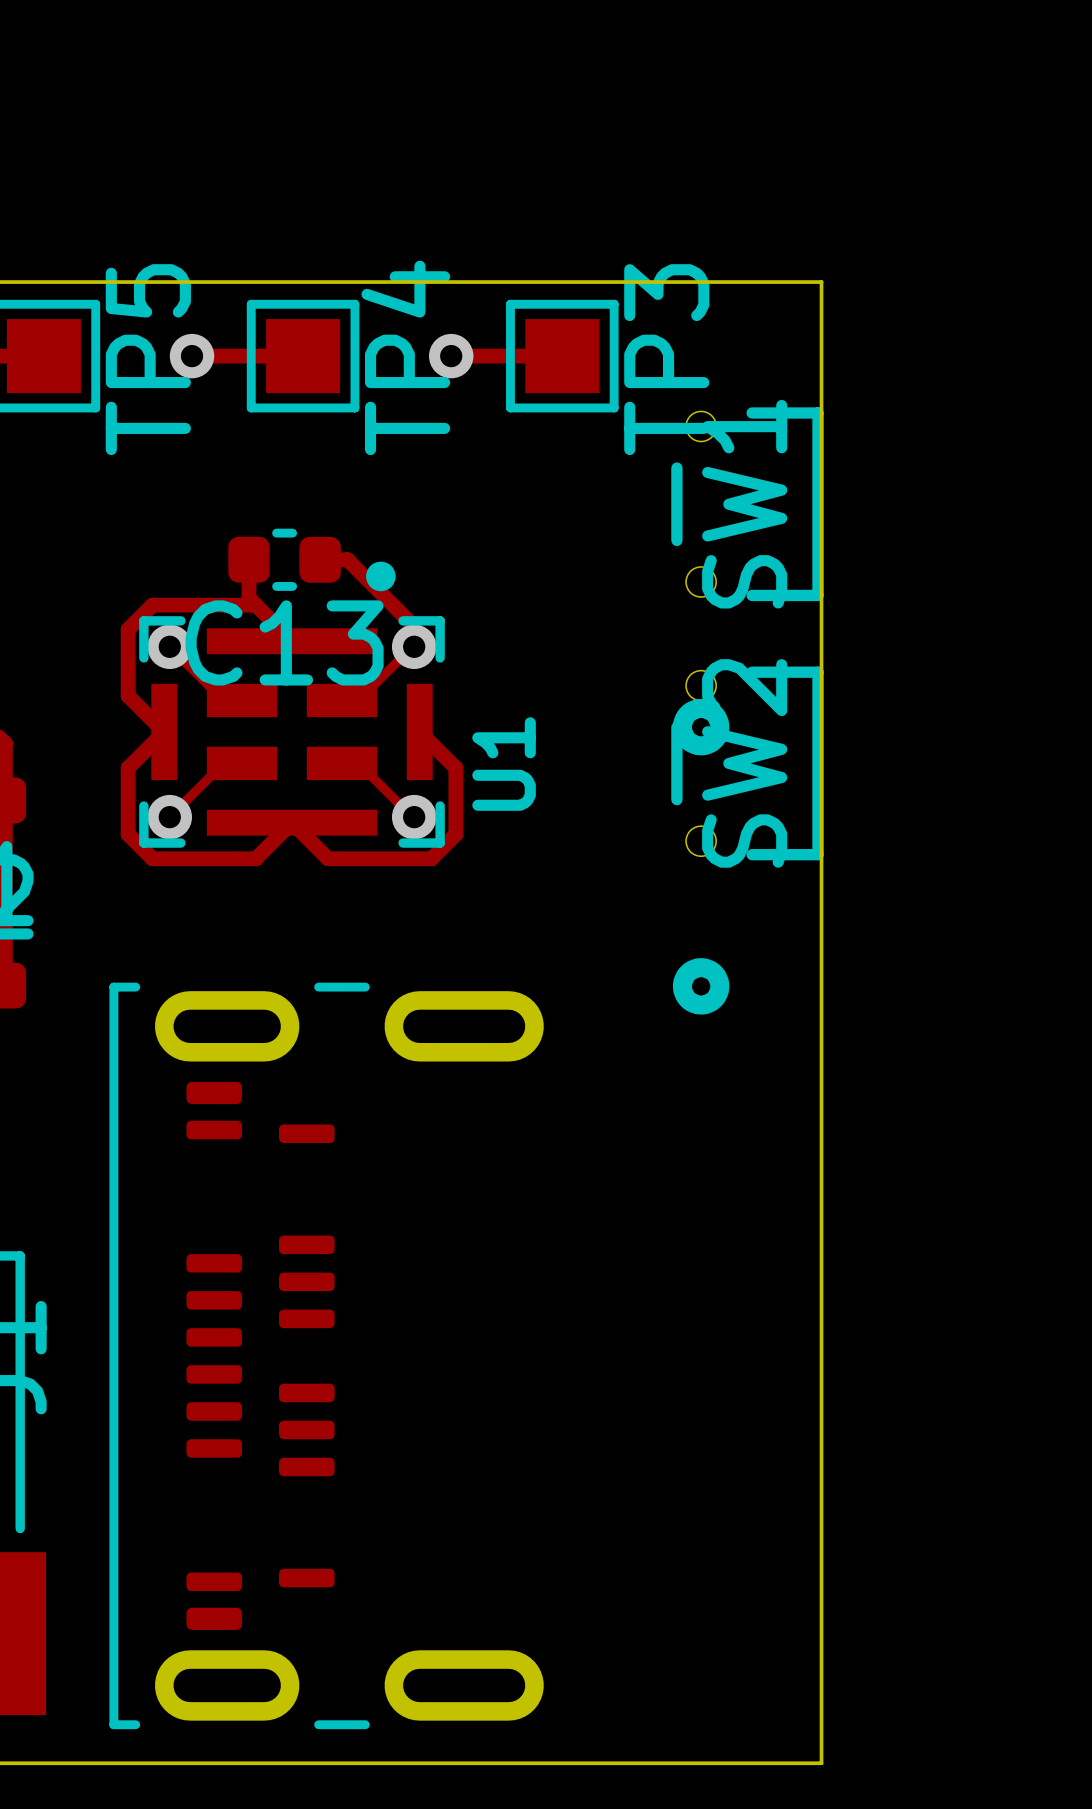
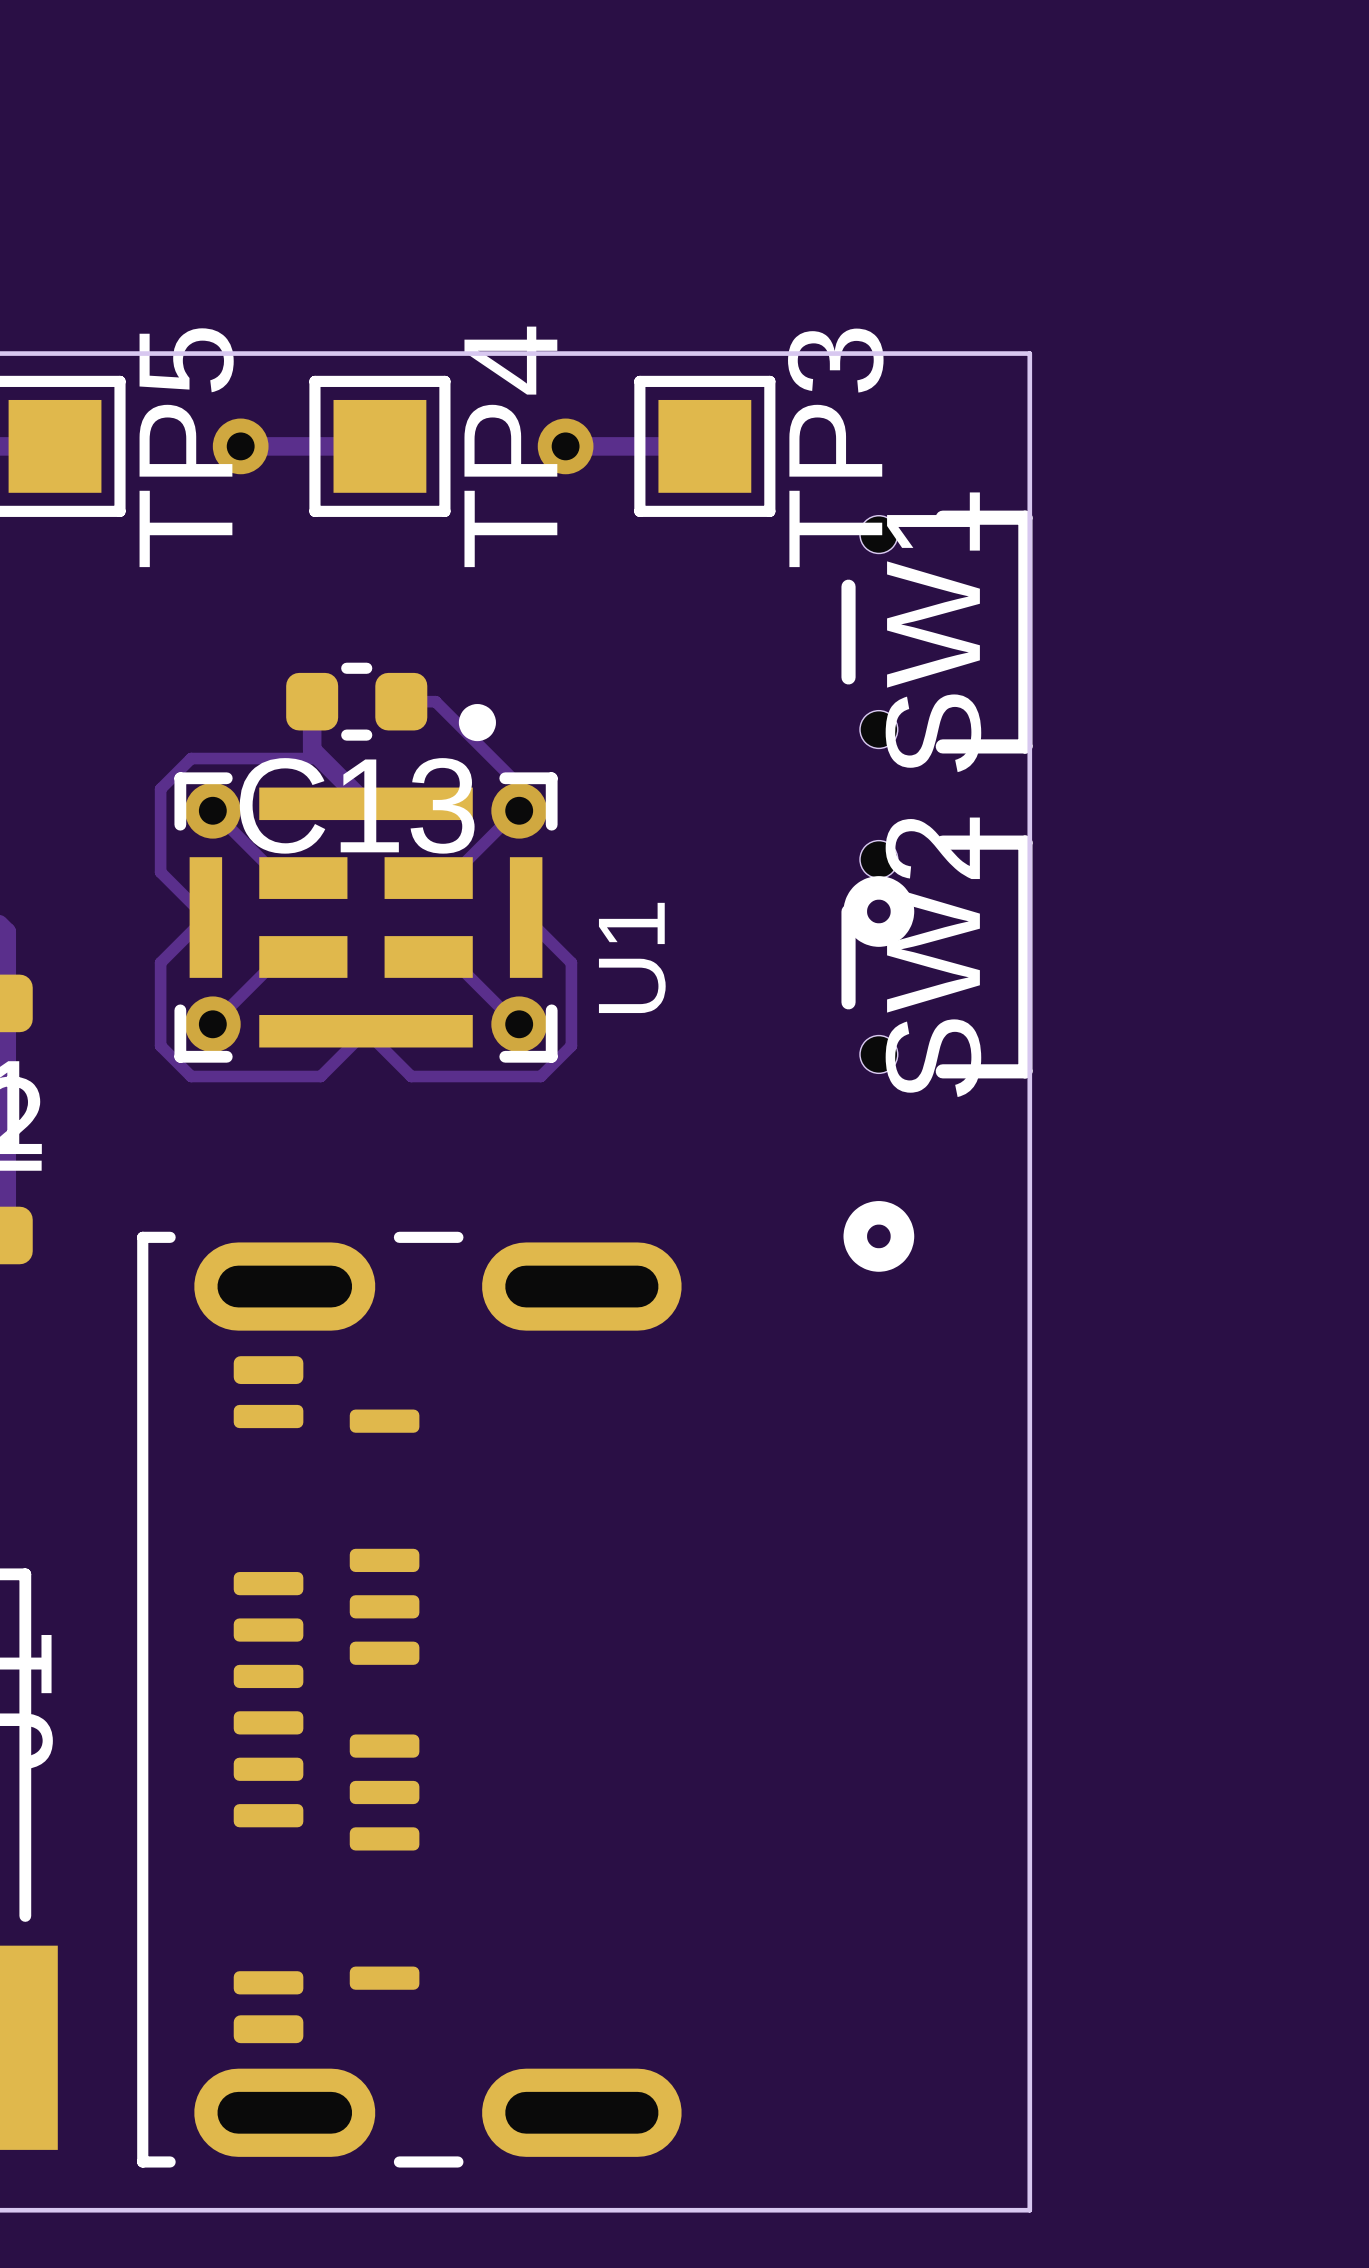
track width: thick (320, 559) (347, 559) (414, 626) -> thin (401, 701) (435, 701) (519, 785)
track width: thick (255, 605) (152, 605) (128, 629) (128, 695) (164, 731) (128, 768) (128, 834) (152, 858) (255, 858) (291, 822) (328, 858) (431, 858) (455, 834) (455, 768) (419, 731) -> thin (320, 758) (191, 758) (160, 789) (160, 872) (205, 917) (160, 962) (160, 1045) (191, 1076) (320, 1076) (366, 1031) (411, 1076) (540, 1076) (571, 1045) (571, 962) (526, 917)

